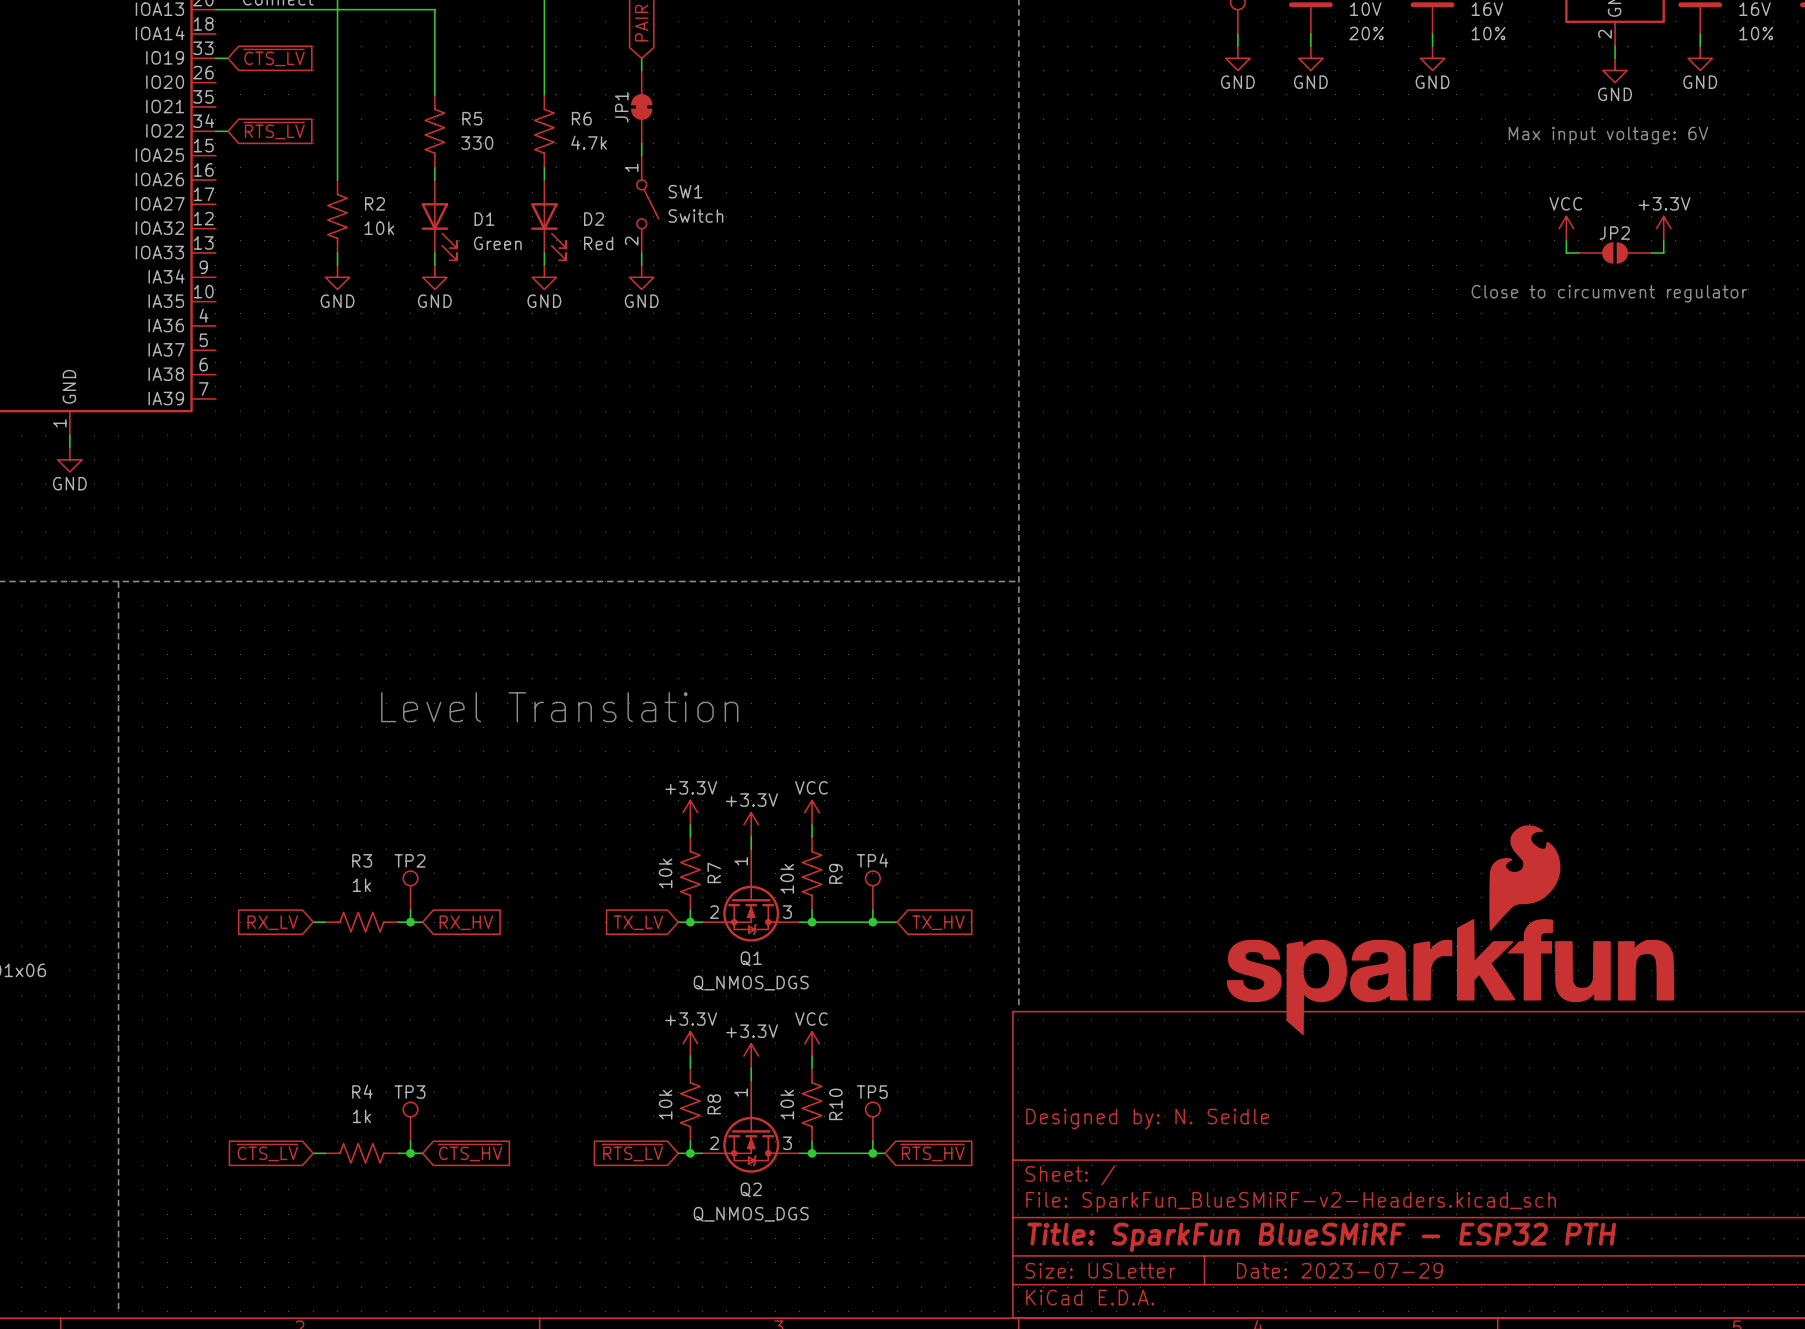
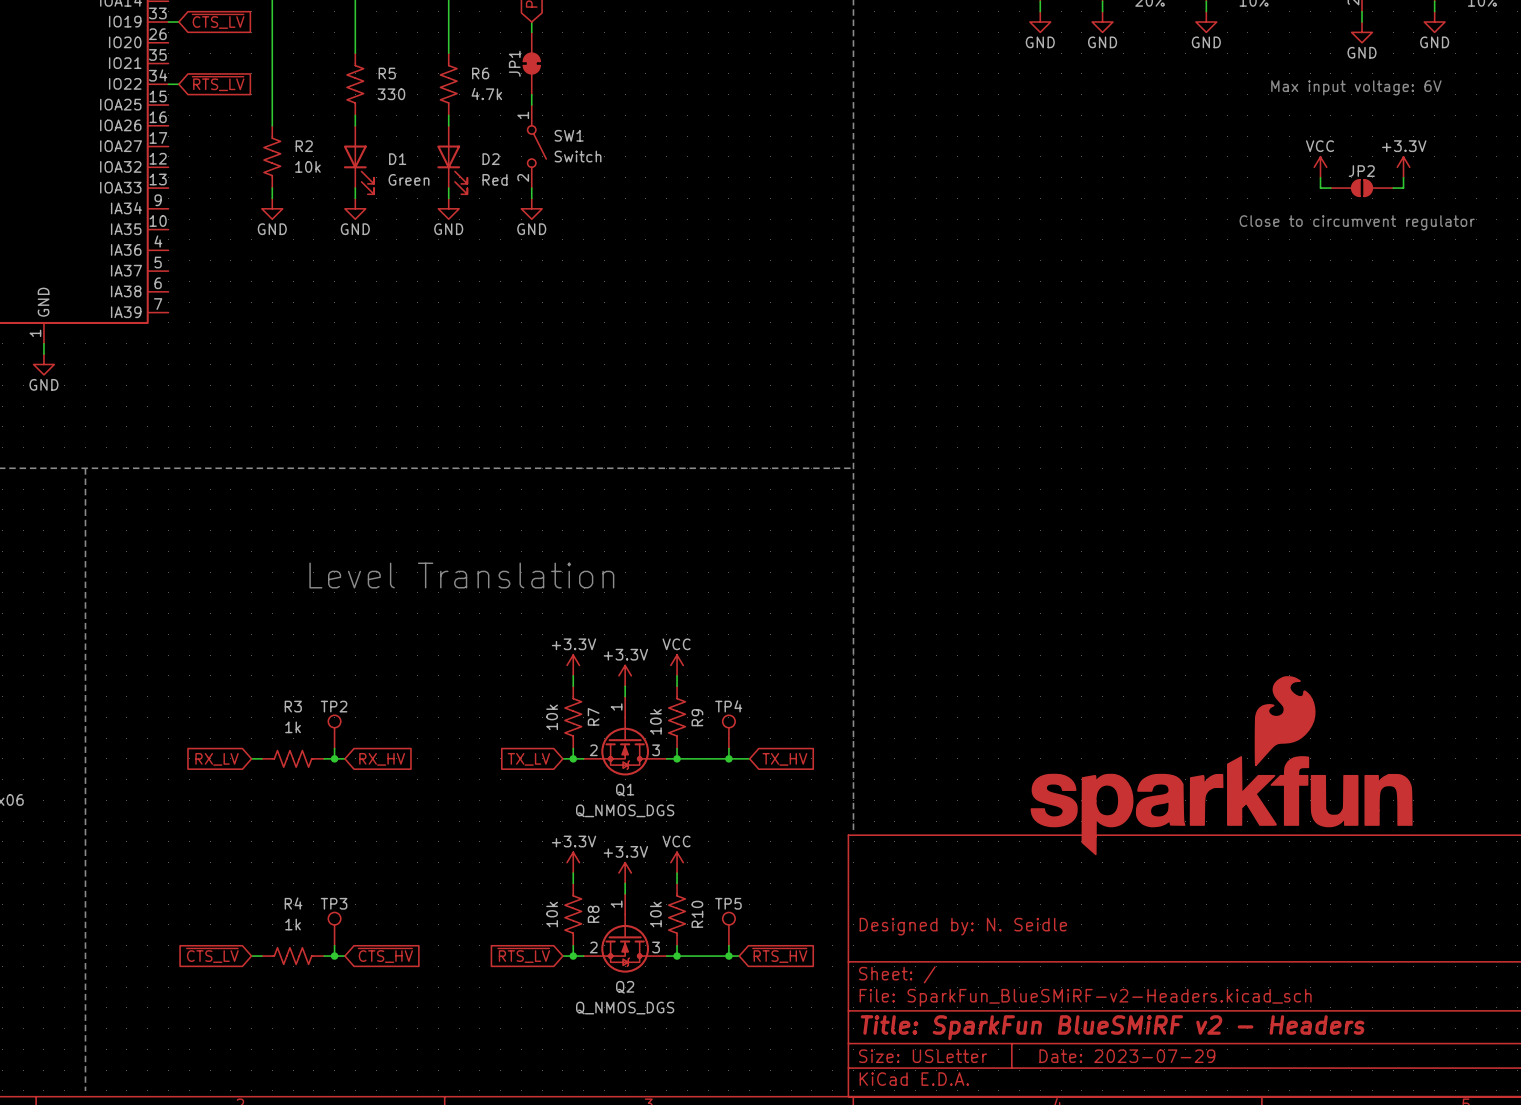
title block: Title: SparkFun BlueSMiRF - ESP32 PTH (1321, 1237) -> Title: SparkFun BlueSMiRF v2 - Headers (1112, 1027)

